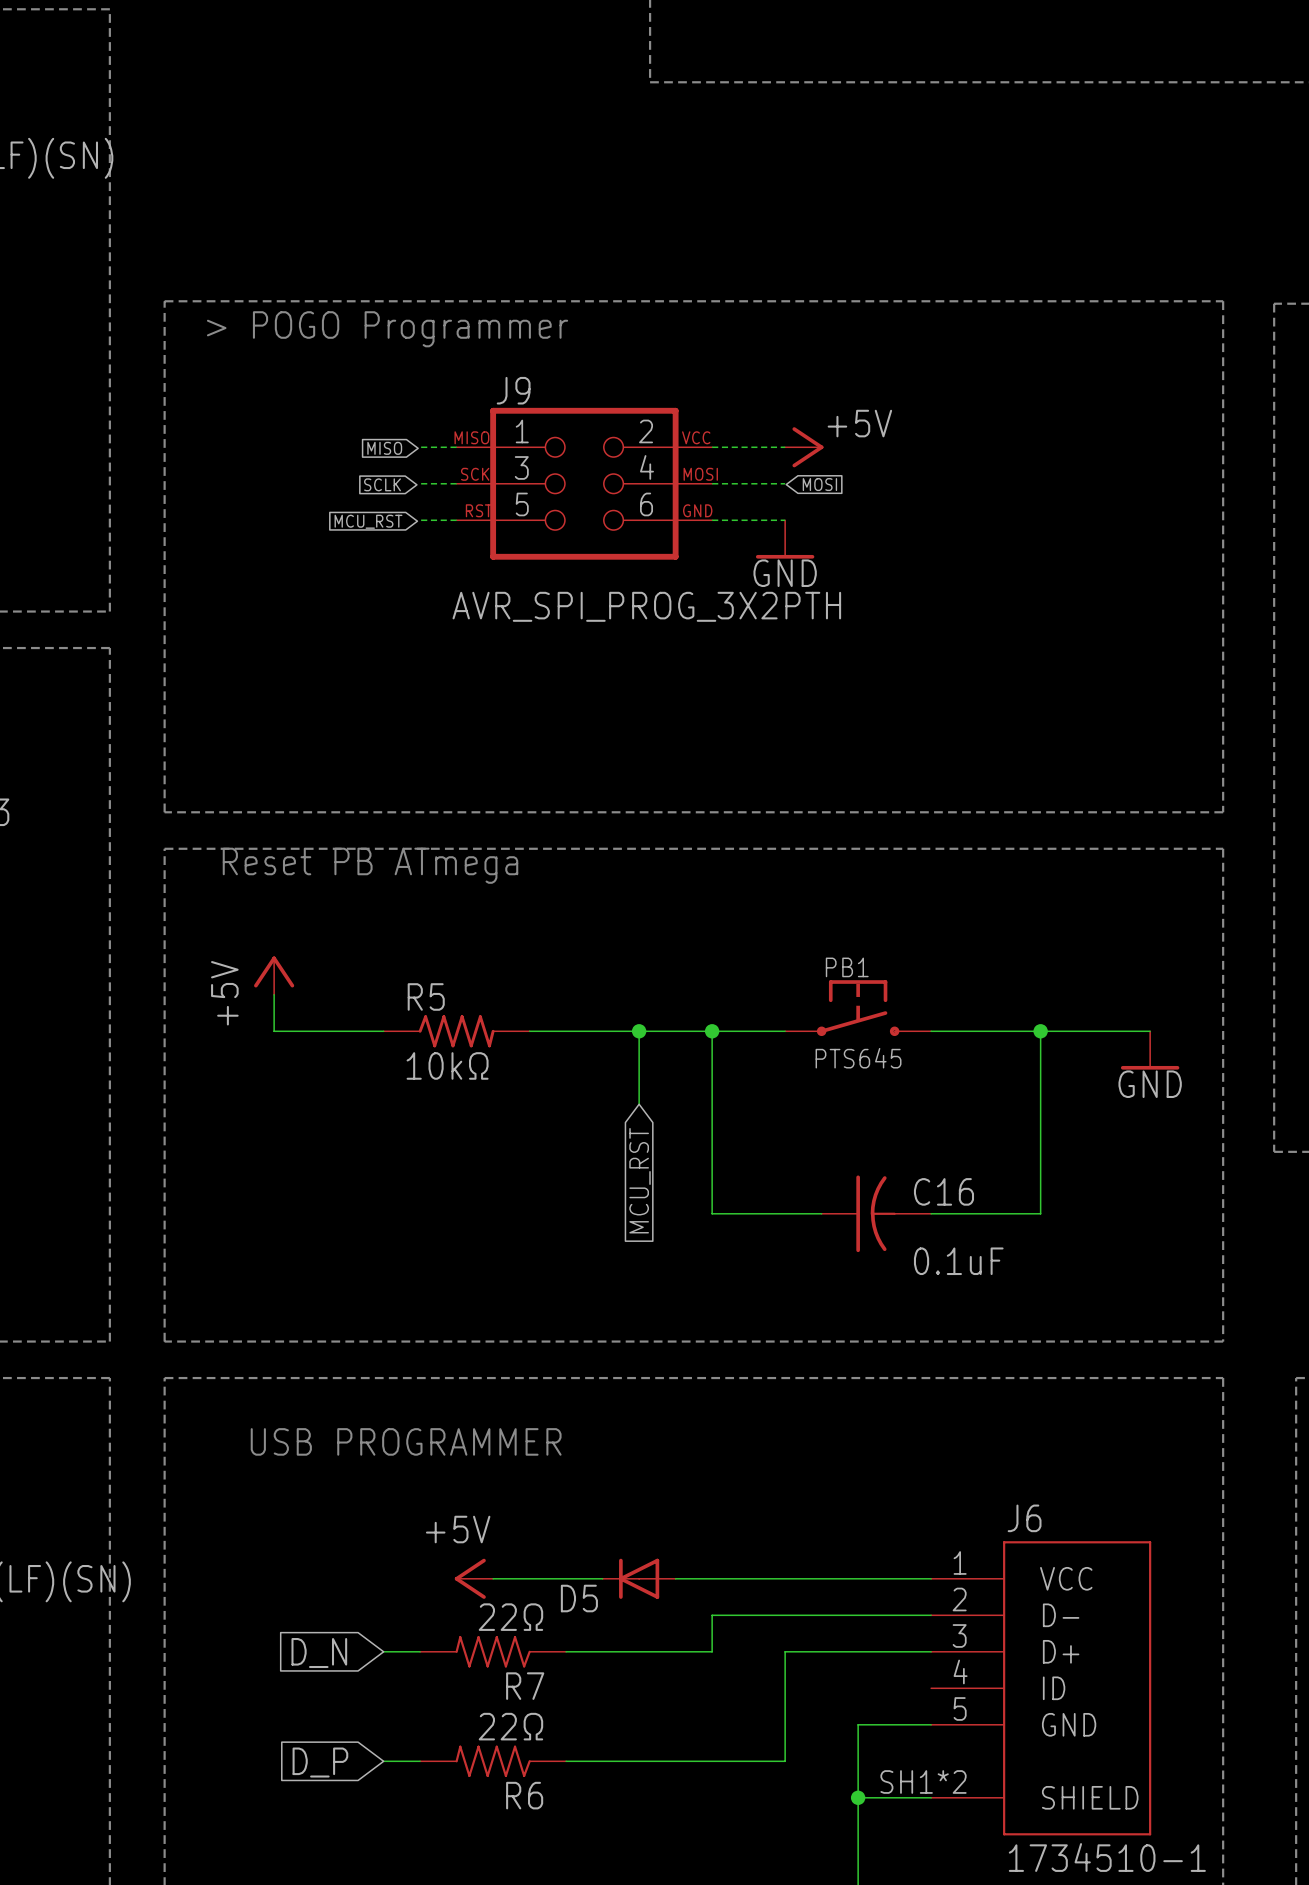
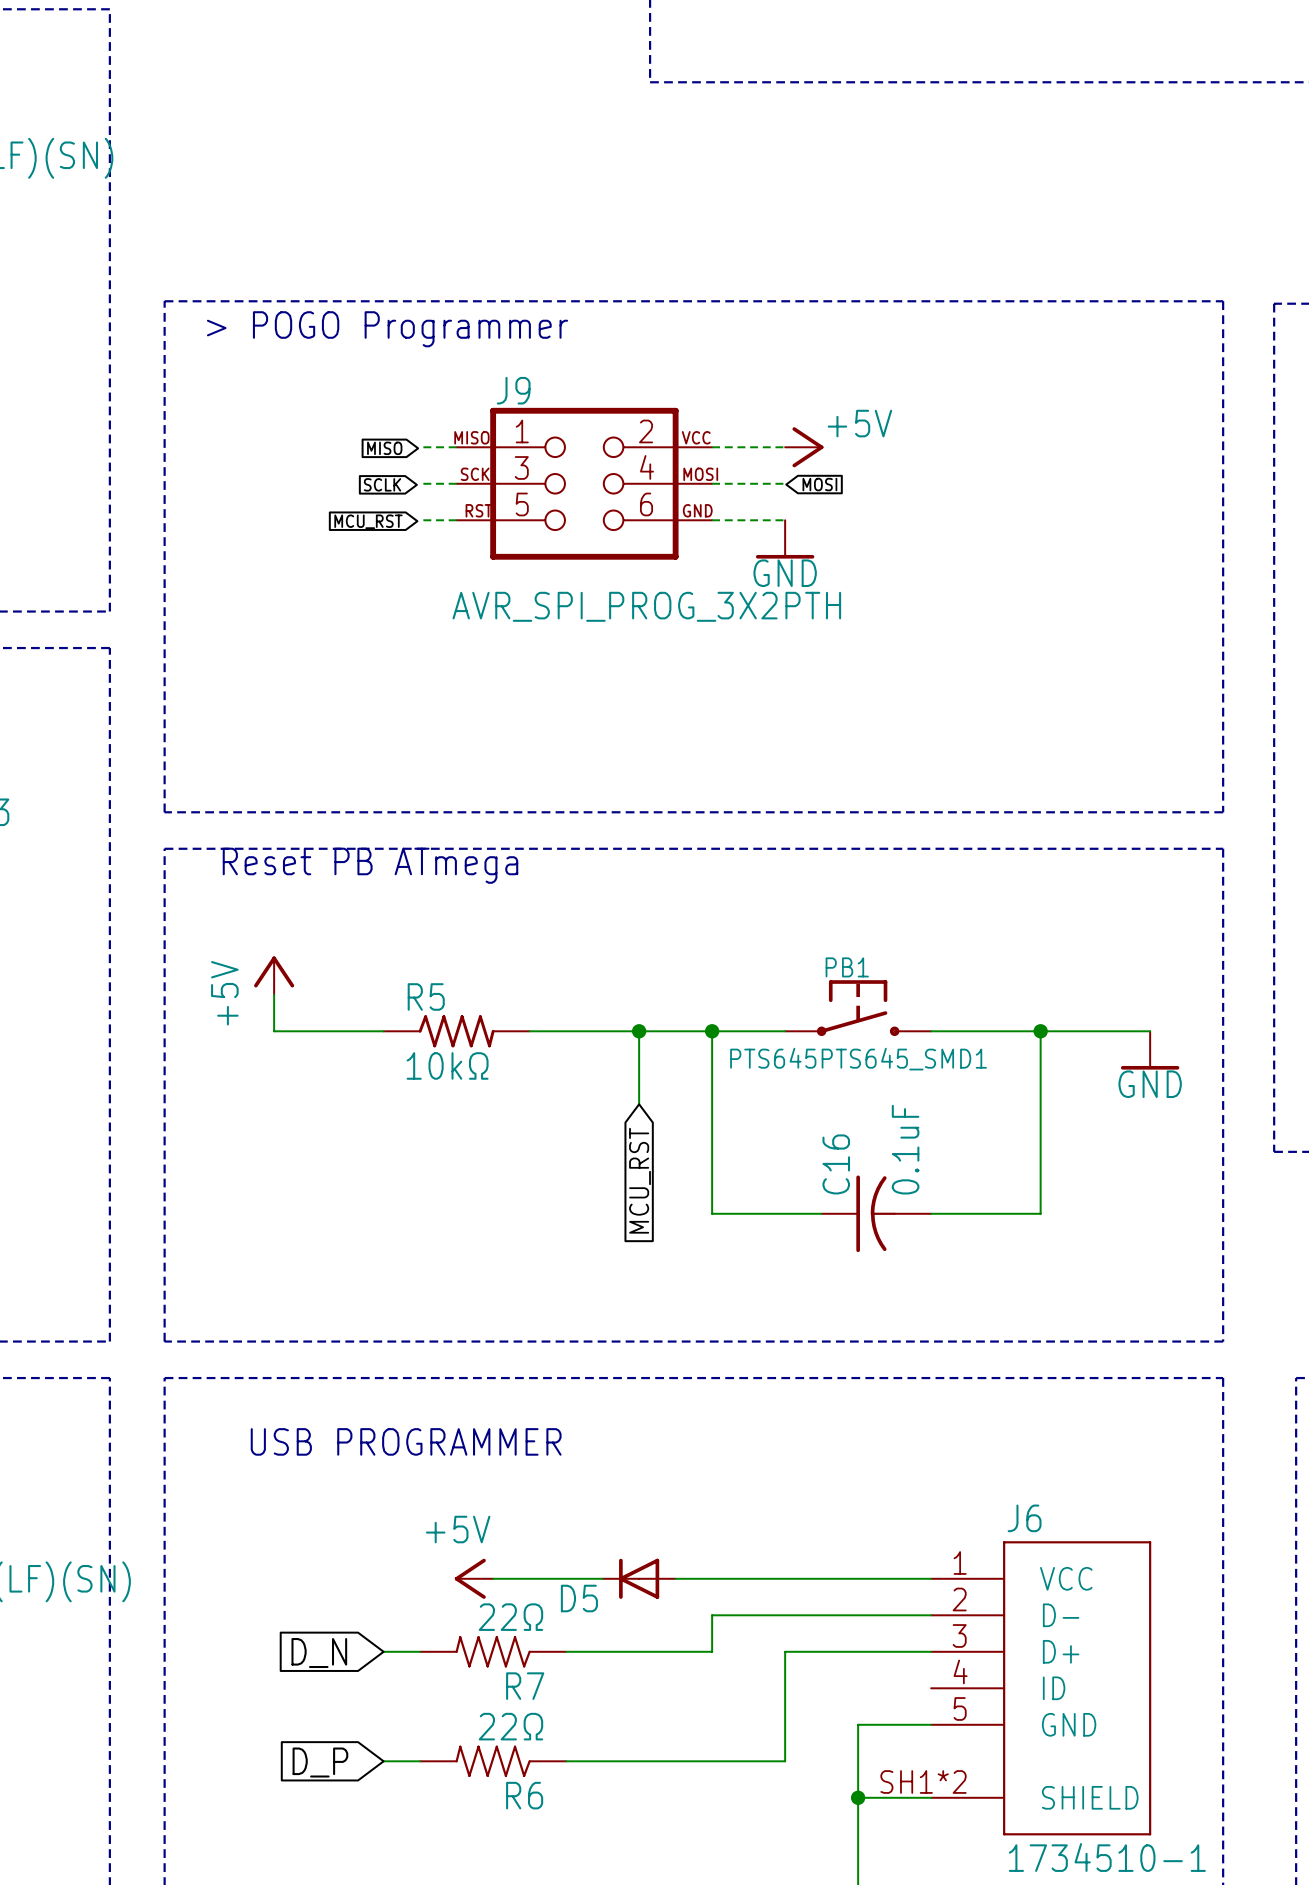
PB1 value: PTS645 (858, 1058) -> PTS645PTS645_SMD1 (858, 1059)
C16 name rotation: 0° (943, 1191) -> 90° counterclockwise (836, 1164)
C16 name position: C16 (943, 1191) -> C16 (836, 1164)
C16 value rotation: 0° (958, 1261) -> 90° counterclockwise (905, 1149)
C16 value position: 0.1uF (958, 1261) -> 0.1uF (905, 1149)

